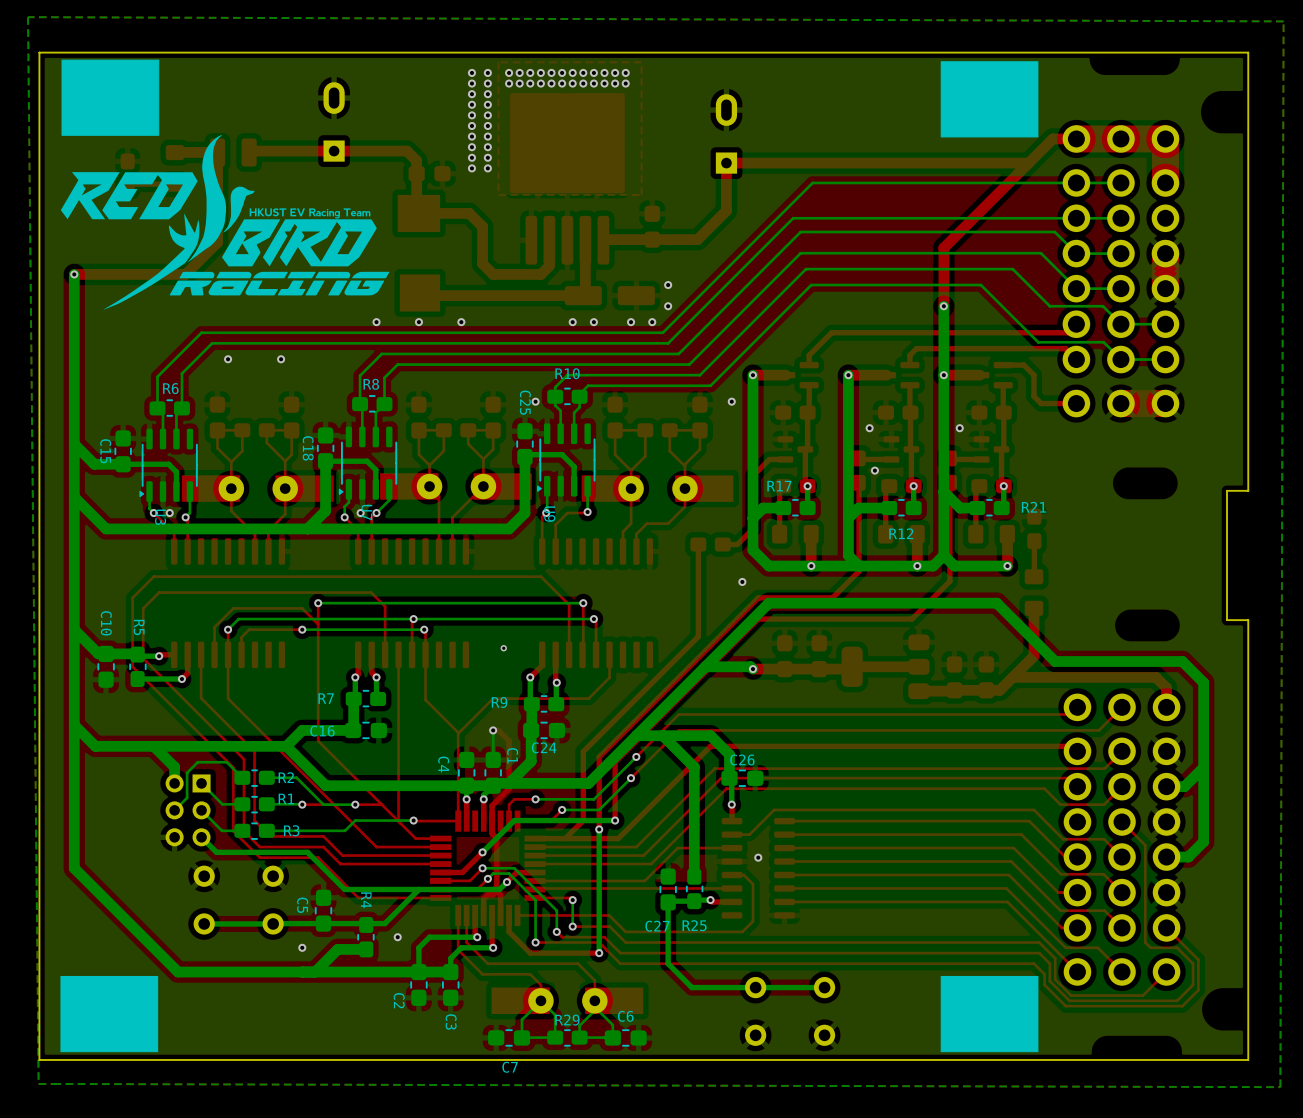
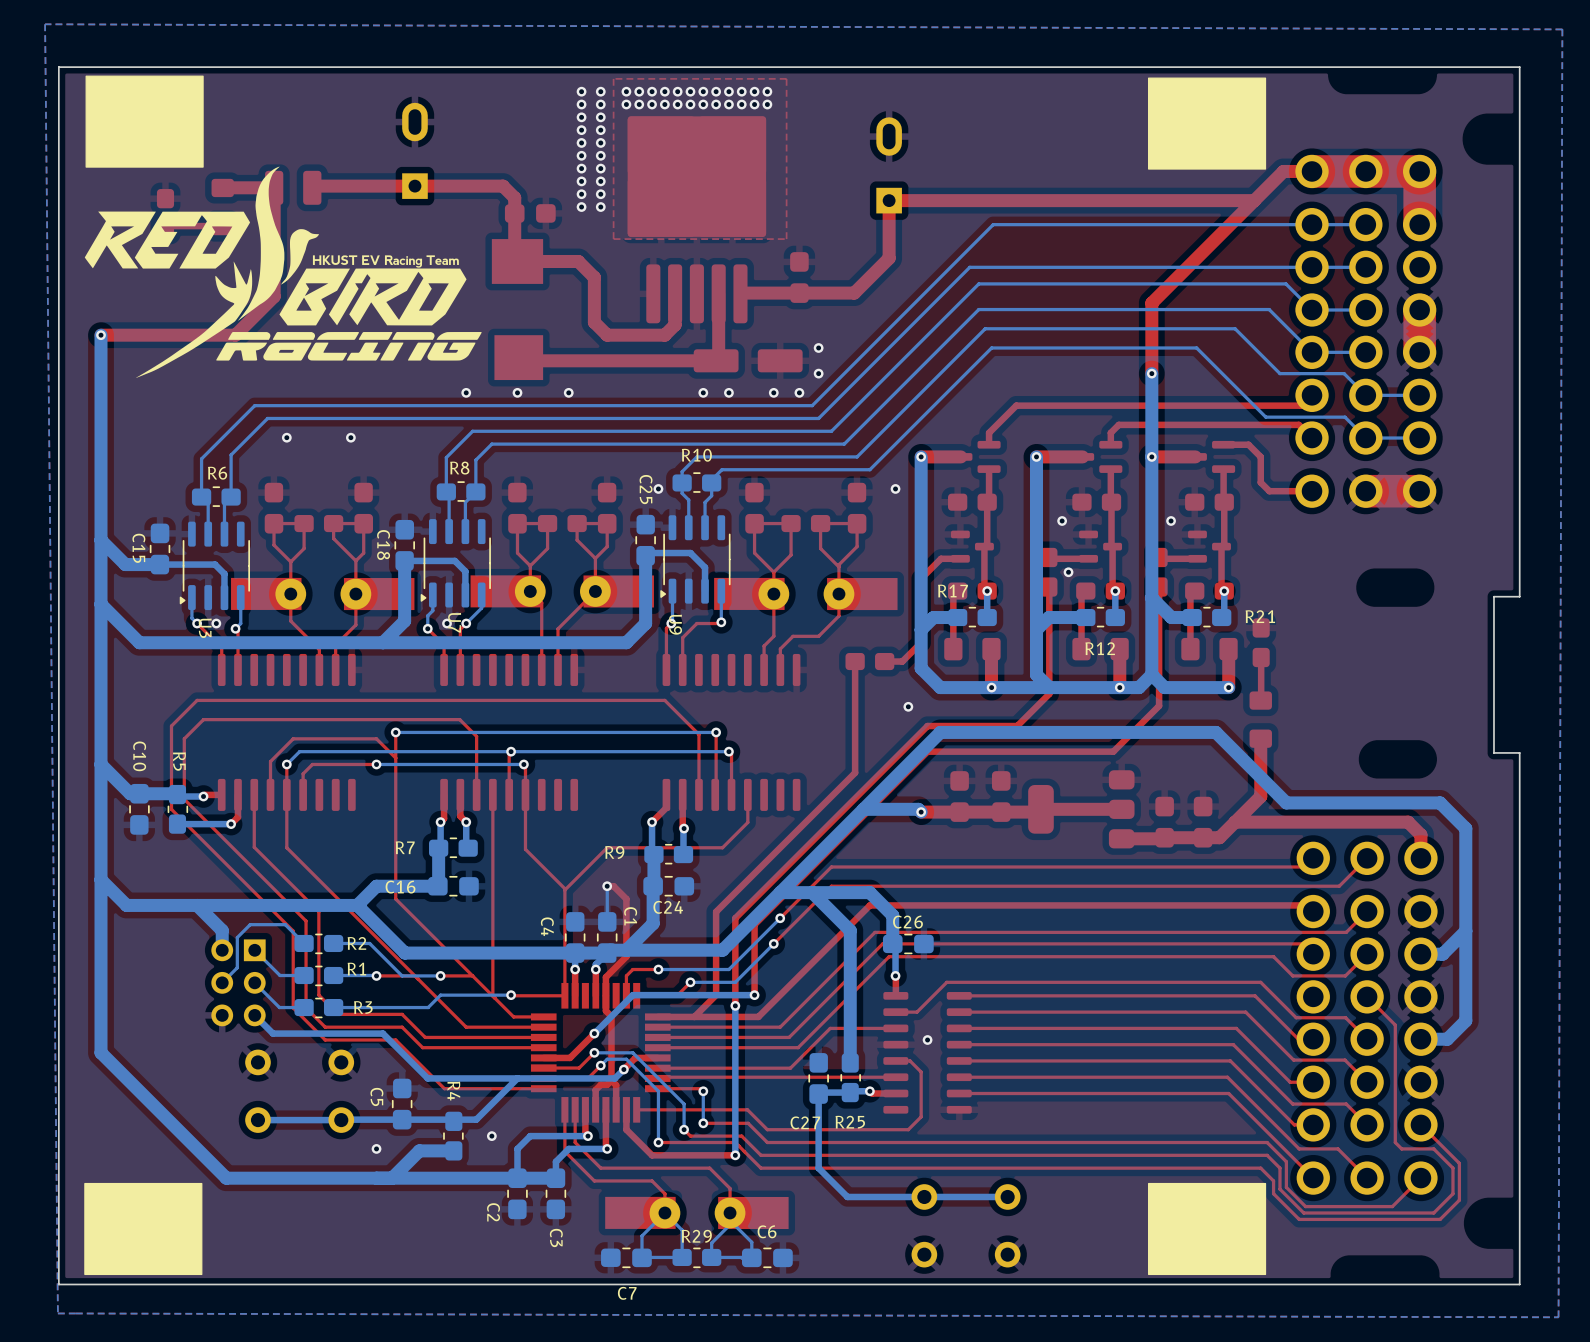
via: (503, 648) -> none

